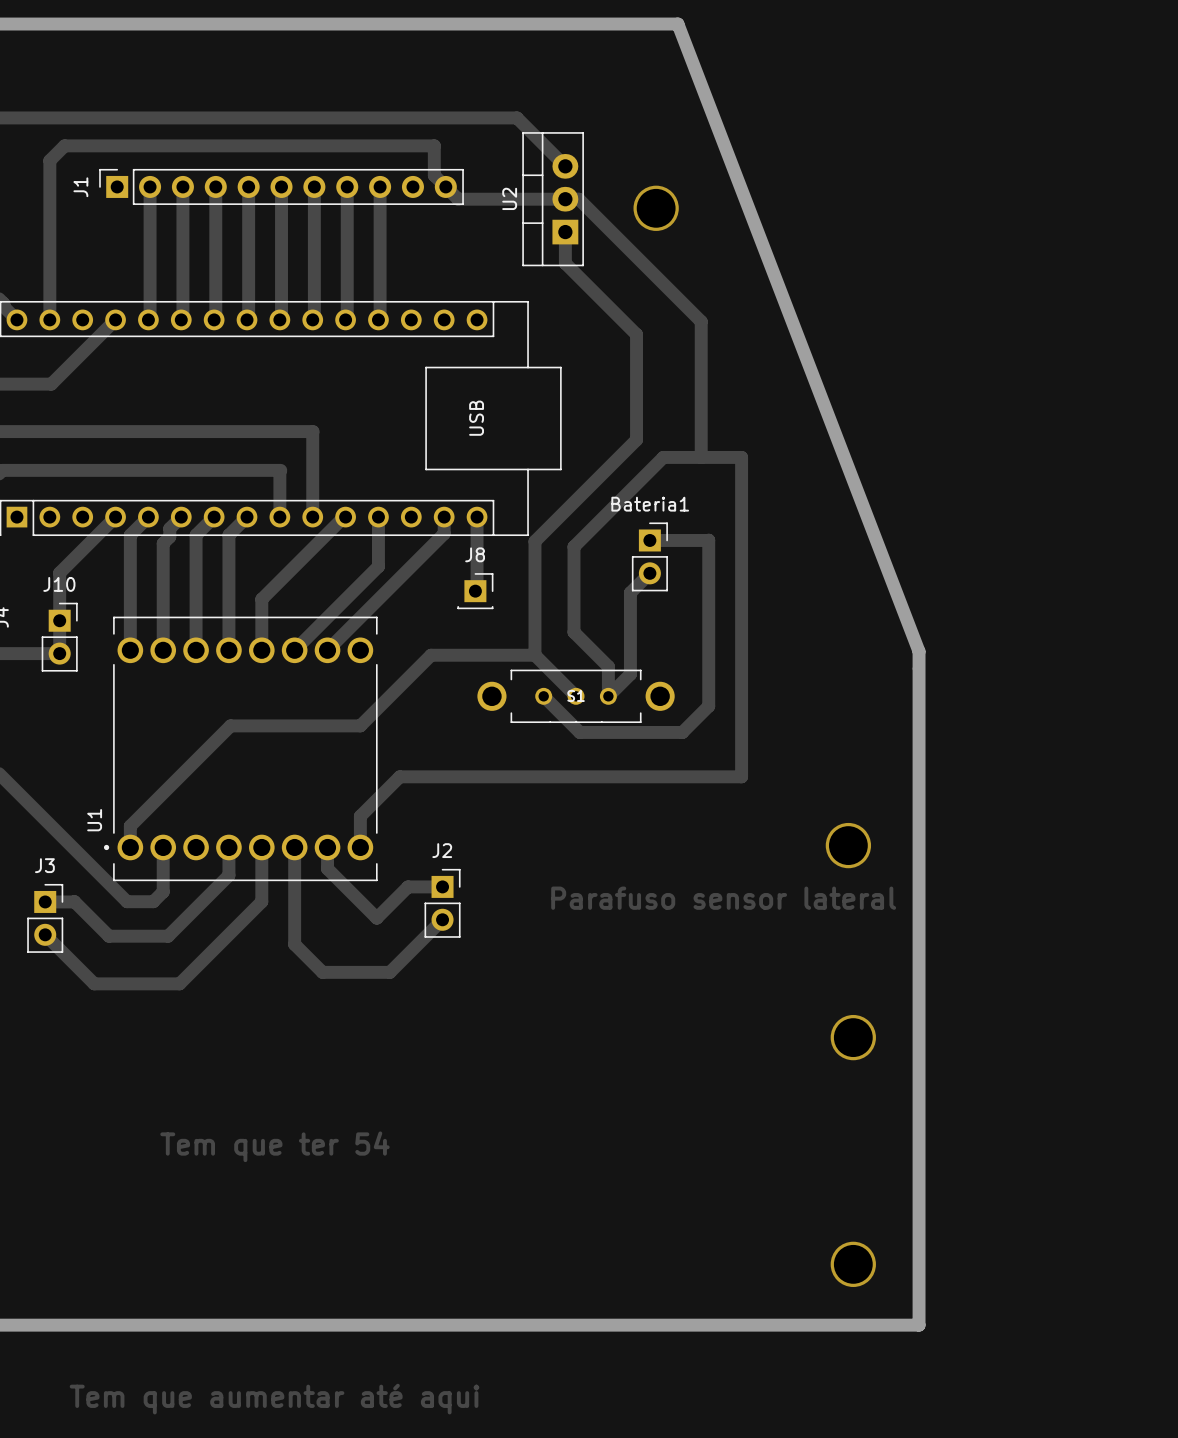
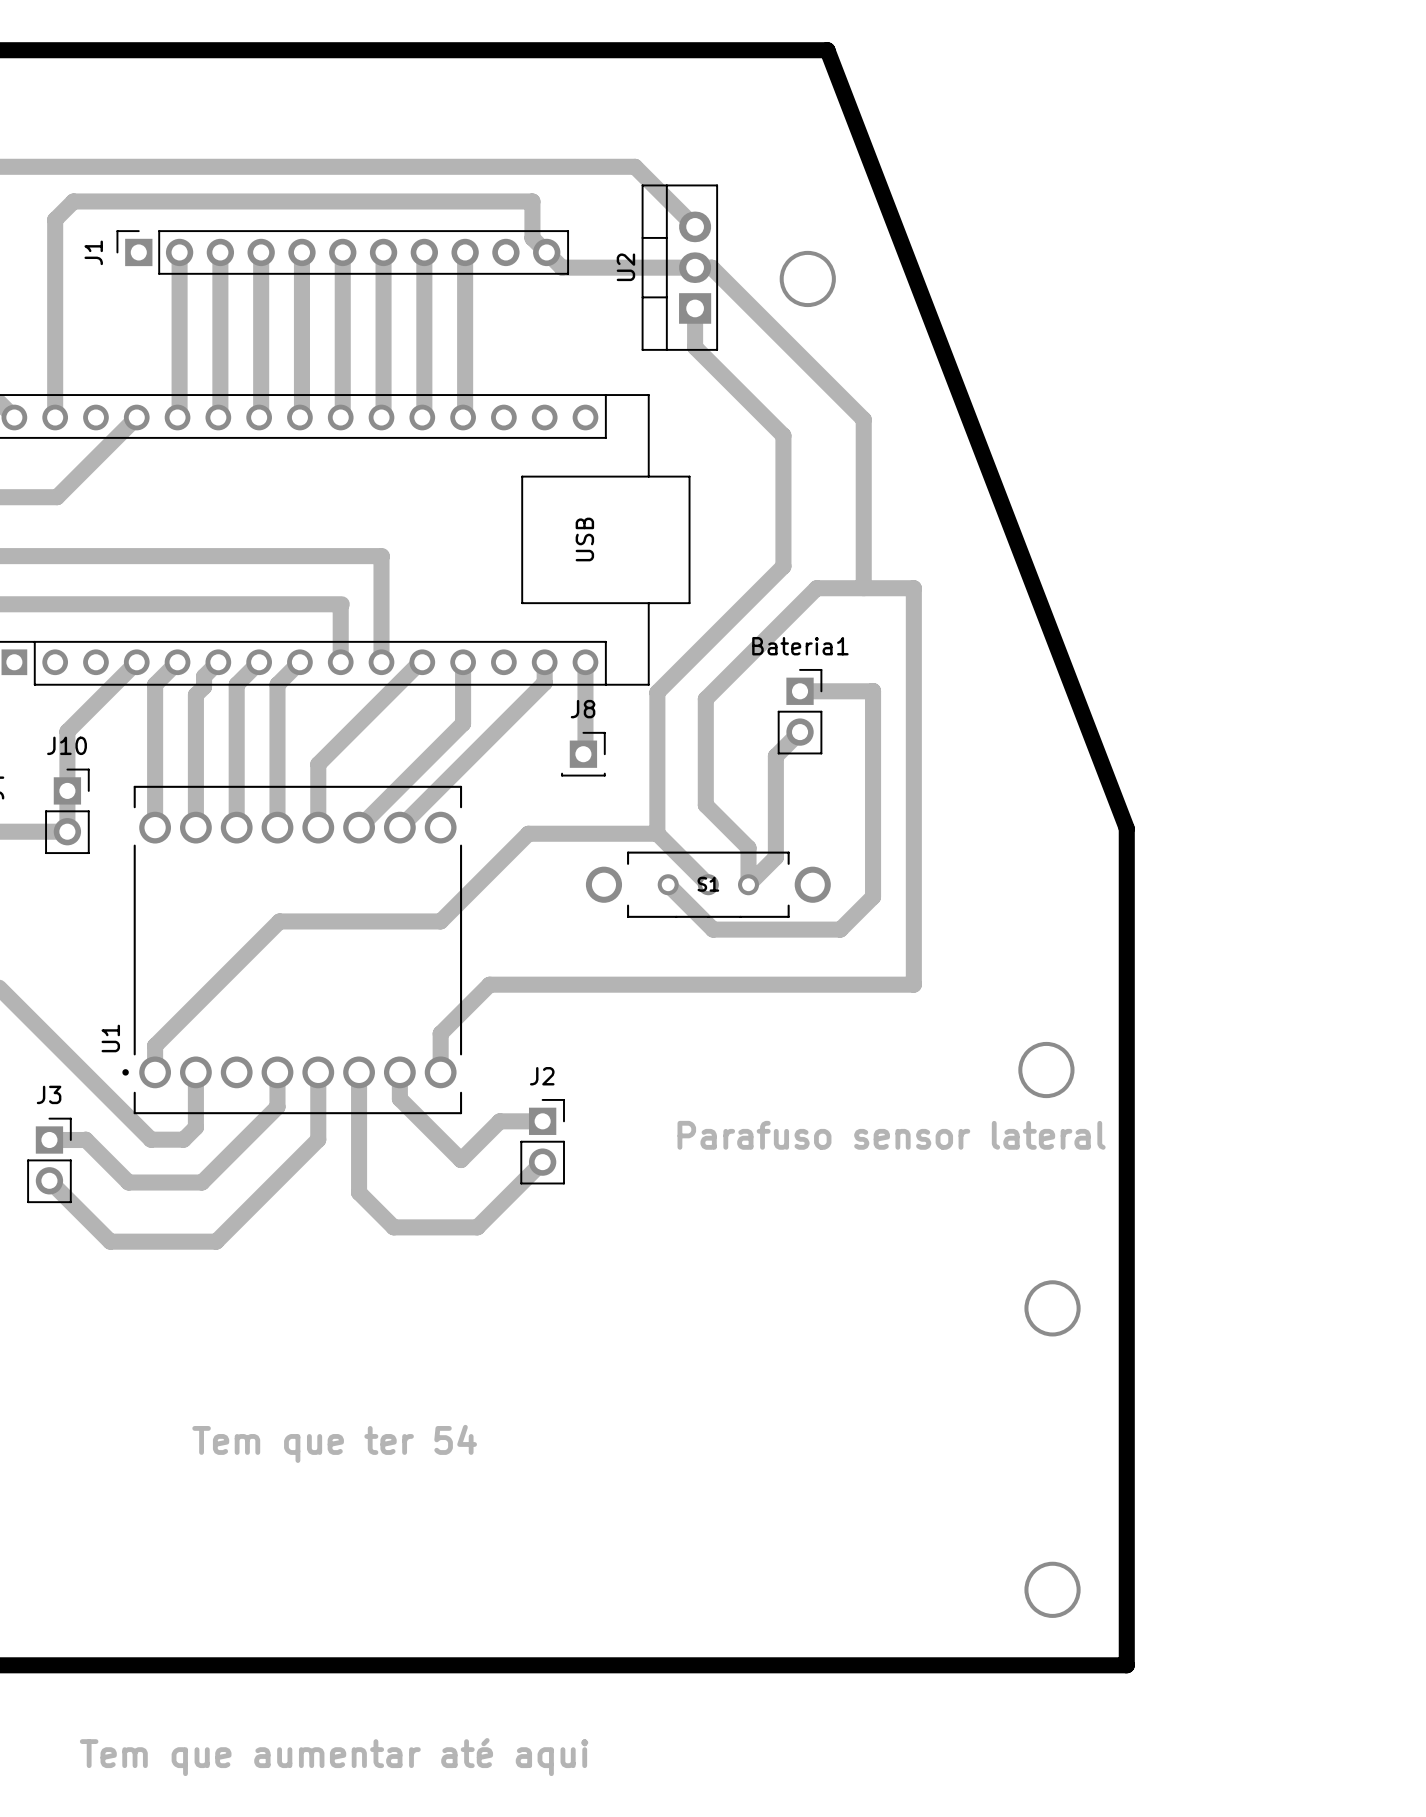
board edge: (671, 24) (677, 24) (919, 651) (919, 1325) (913, 1325) -> (1126, 829) (1126, 1665)
board edge: none -> (827, 50) (1126, 828)

